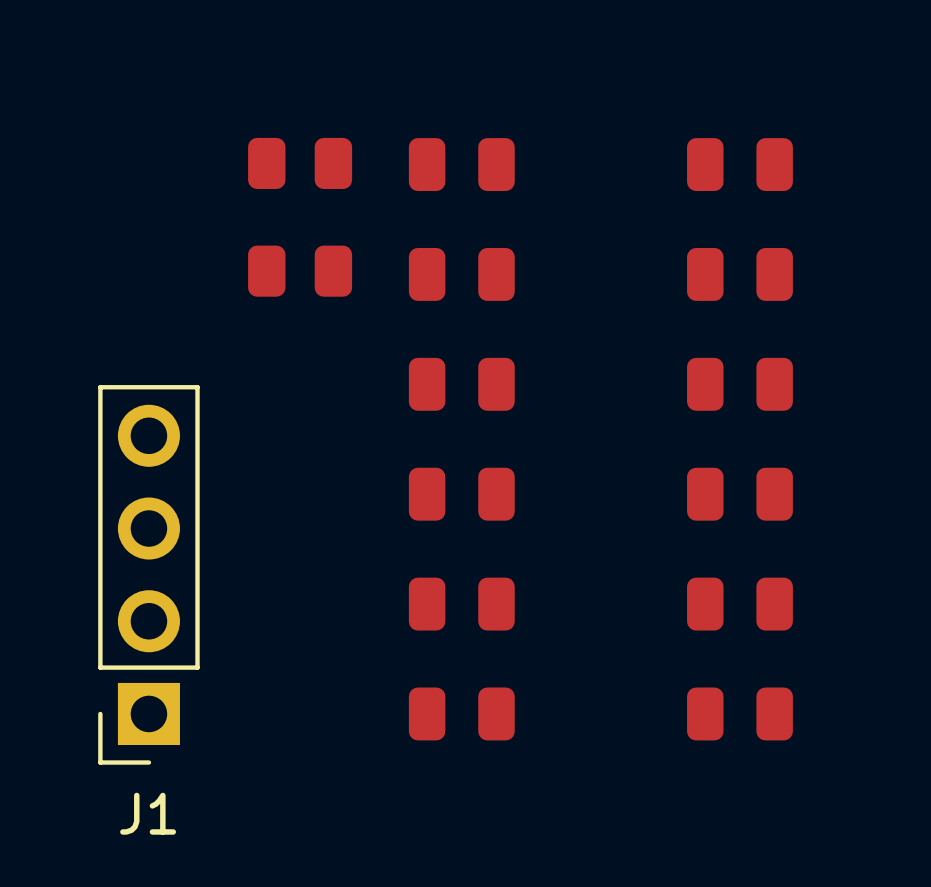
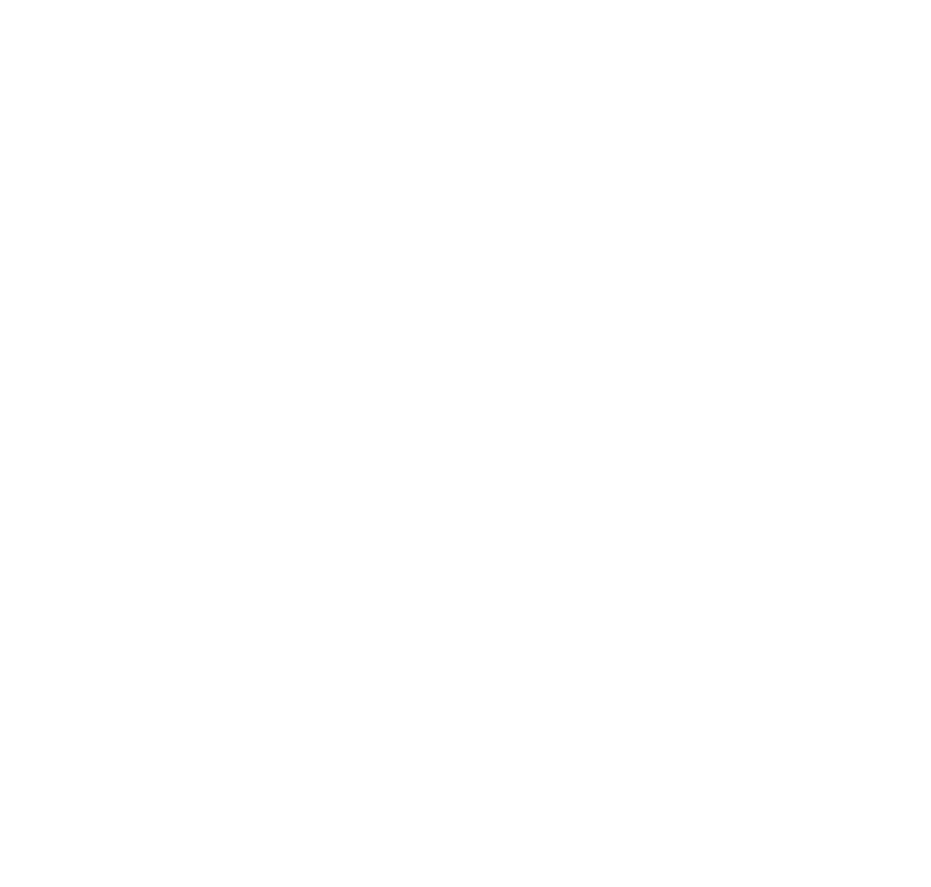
part: (300, 163) -> none
part: (461, 164) -> none
part: (739, 164) -> none
part: (300, 271) -> none
part: (461, 274) -> none
part: (739, 274) -> none
part: (461, 384) -> none
part: (739, 384) -> none
part: (461, 494) -> none
part: (739, 494) -> none
J1: (148, 574) -> none
part: (461, 604) -> none
part: (739, 604) -> none
part: (461, 713) -> none
part: (739, 713) -> none

